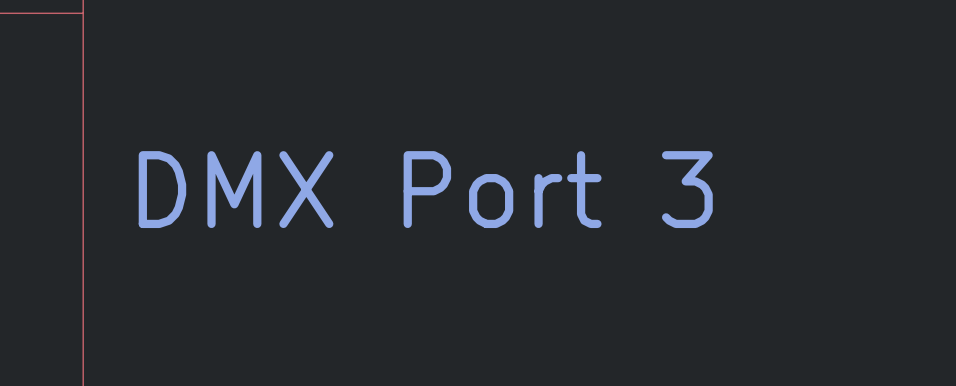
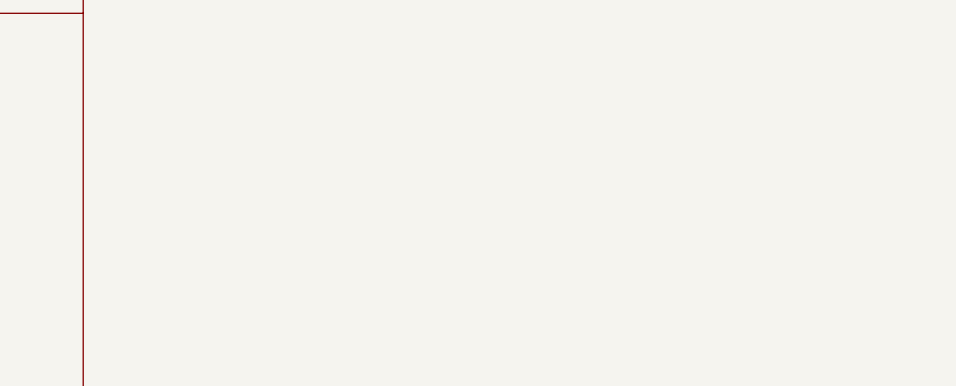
text: DMX Port 3 (425, 189) -> none

